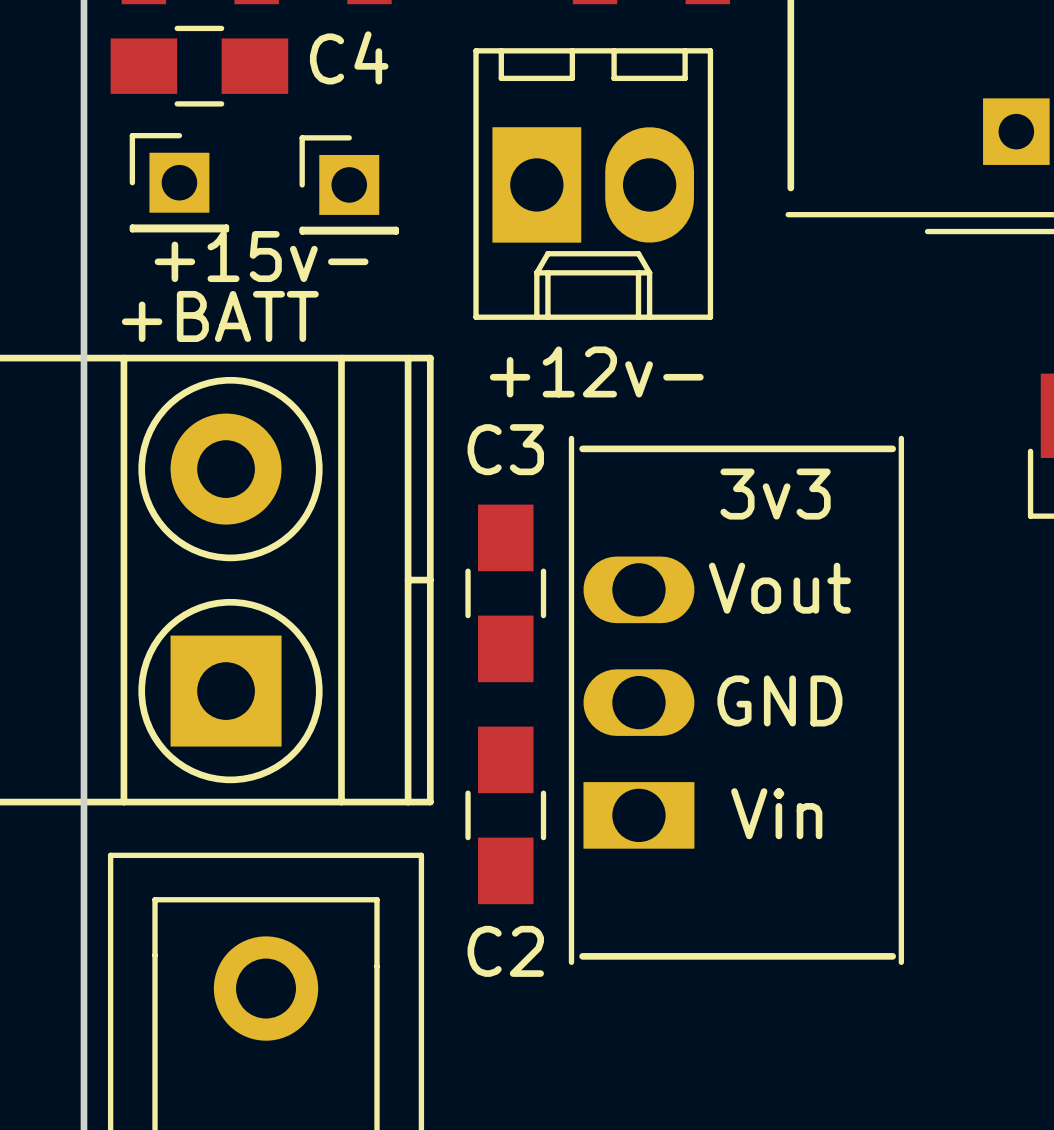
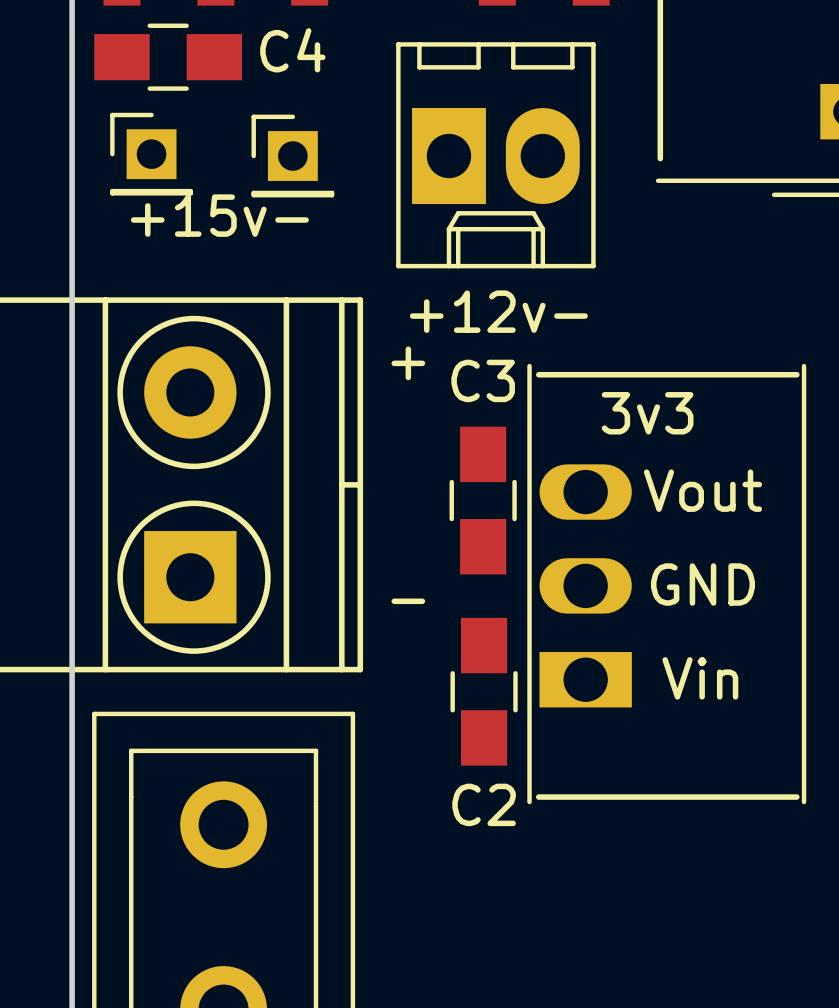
text: +BATT (220, 316) -> none
text: none -> + (408, 363)
C3 position: (505, 593) -> (483, 500)
part position: (736, 700) -> (666, 584)
text: none -> - (408, 601)
C2 position: (505, 815) -> (484, 691)

